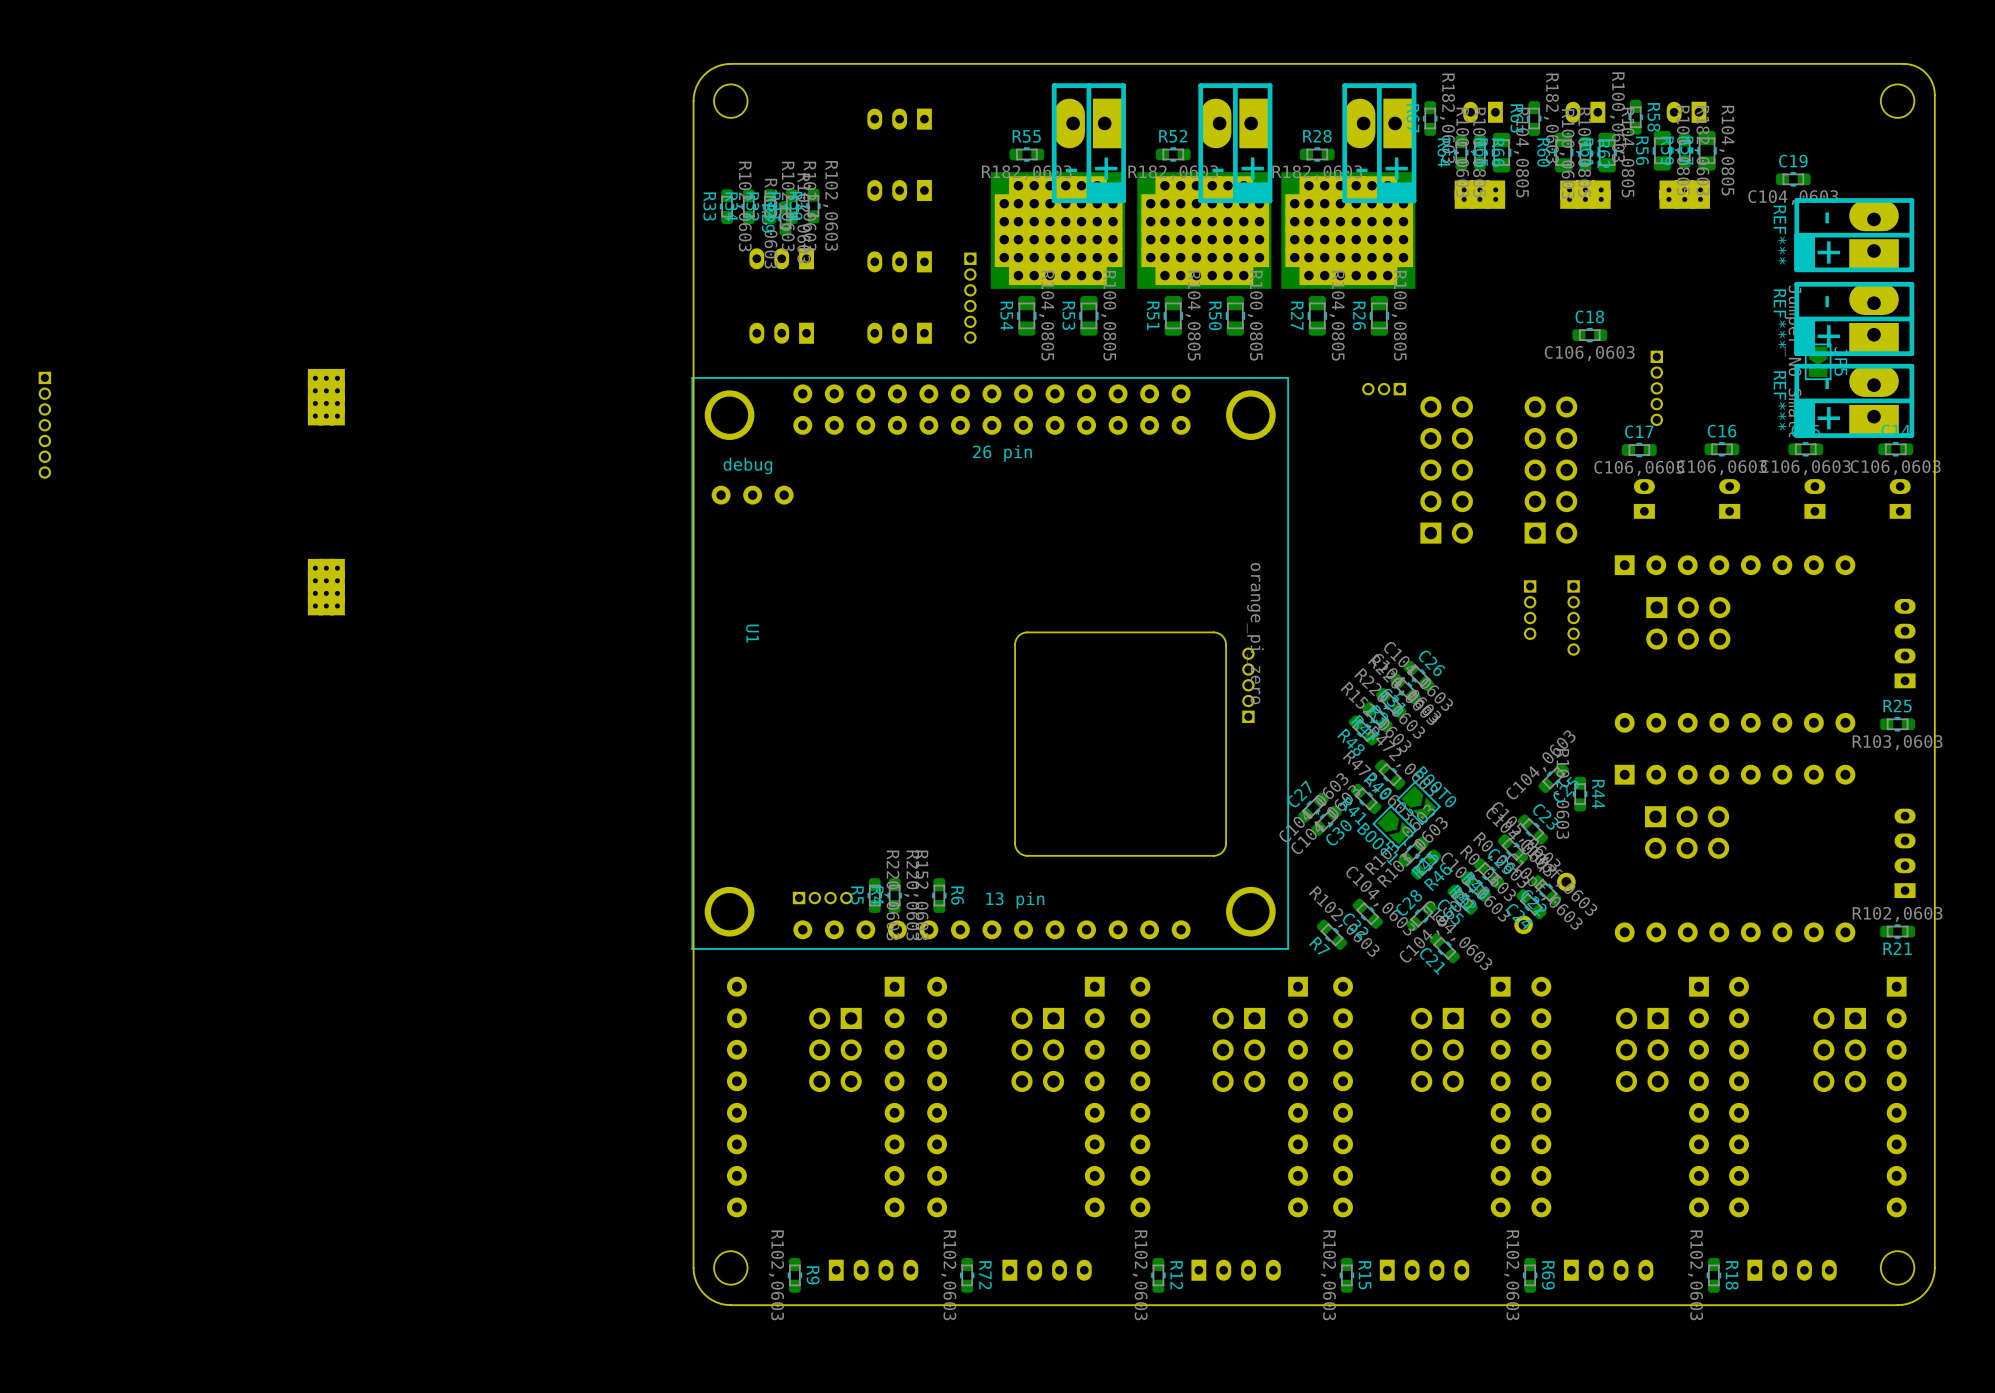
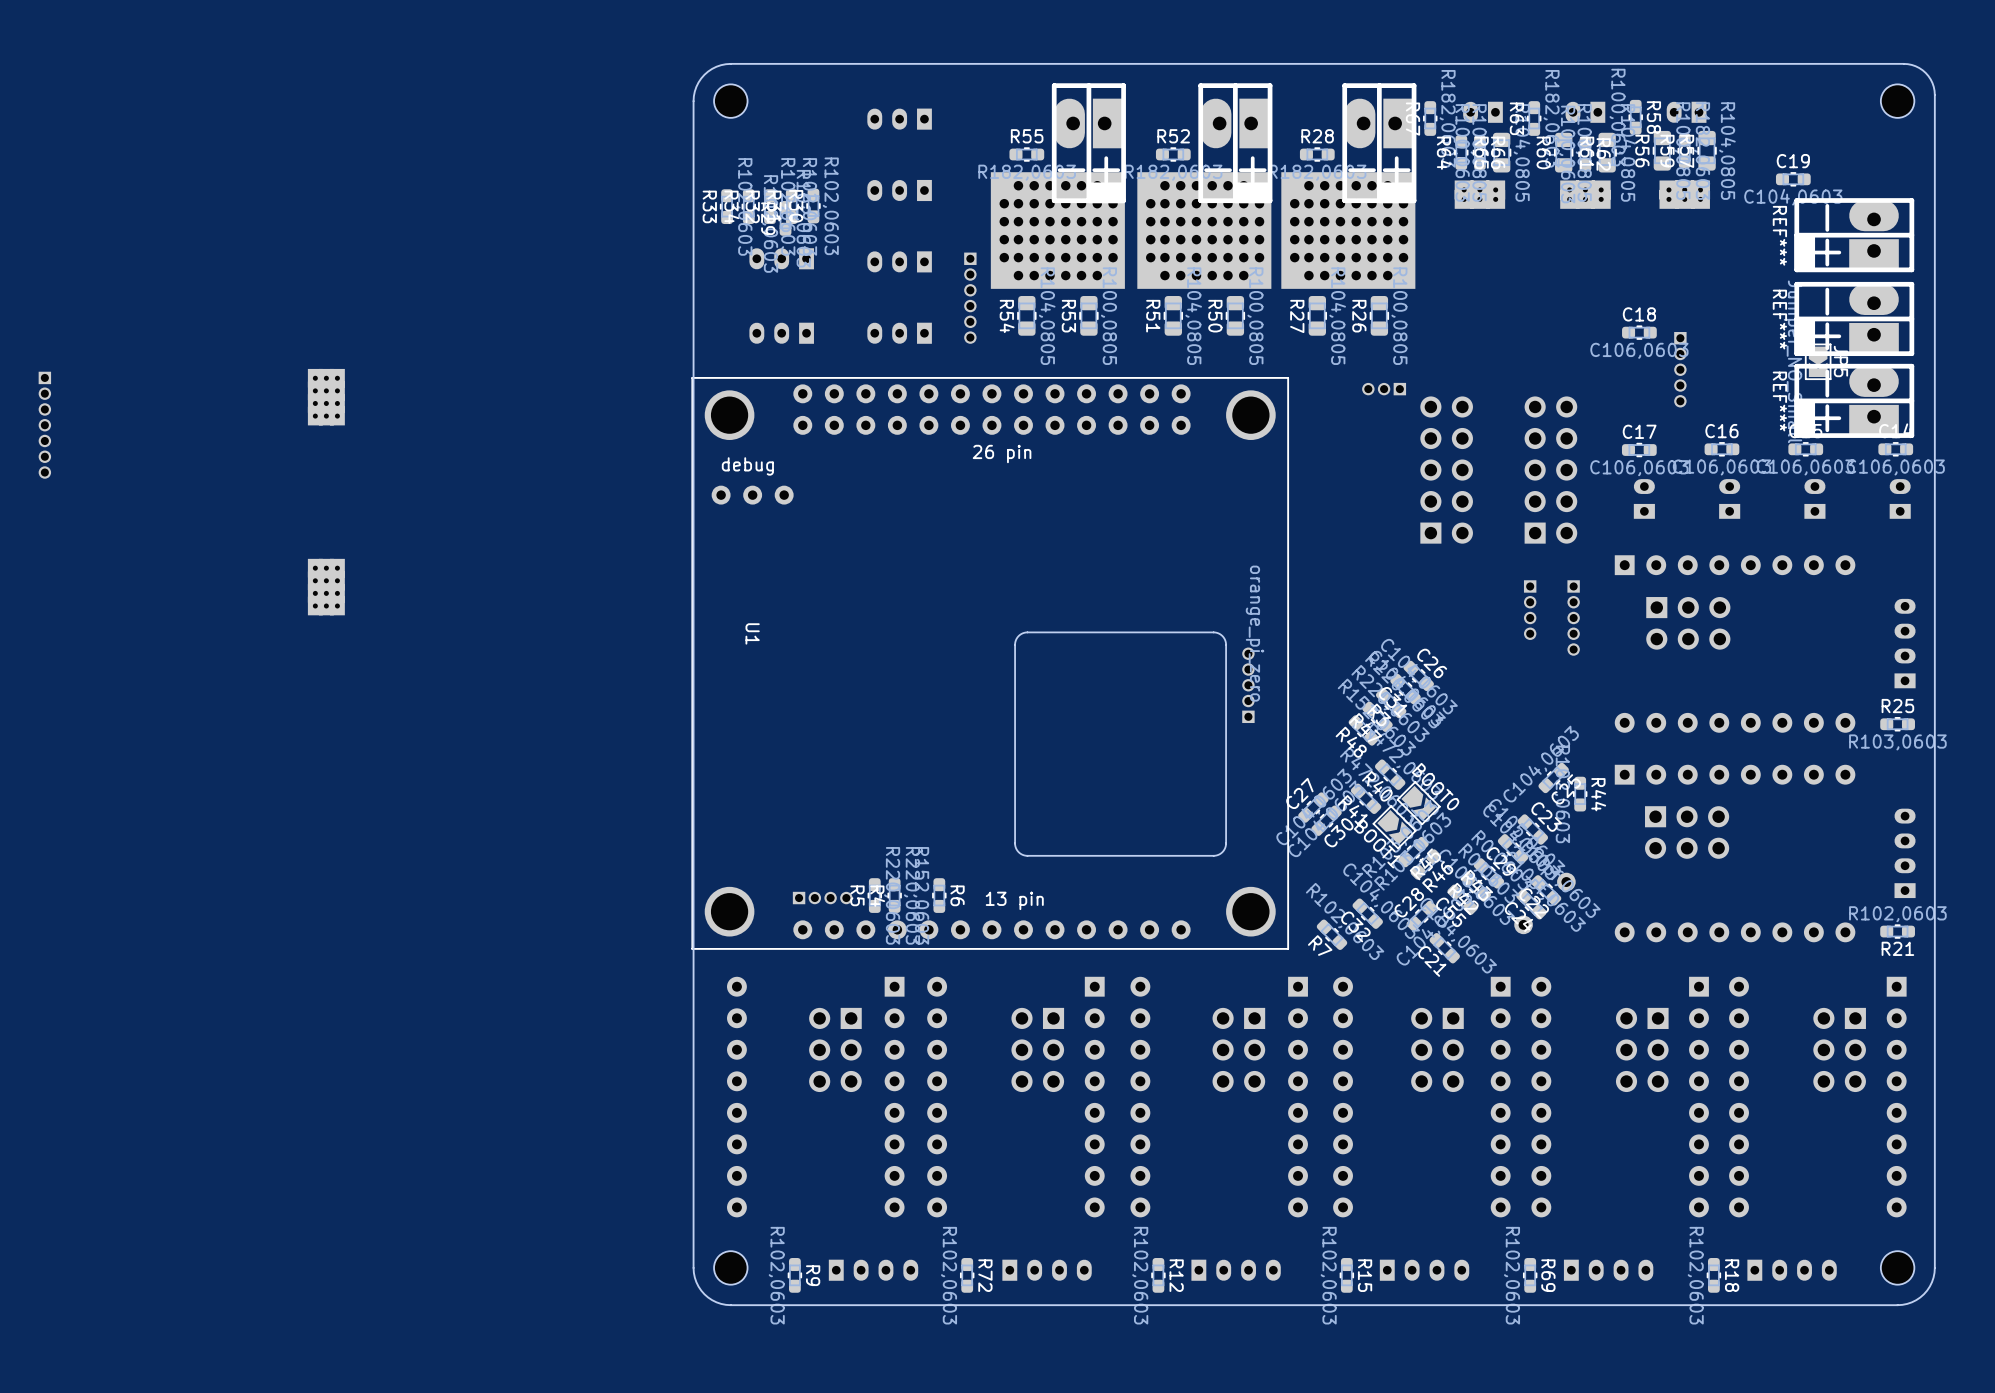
C18 position: (1589, 335) -> (1639, 332)
part position: (1656, 388) -> (1680, 369)

